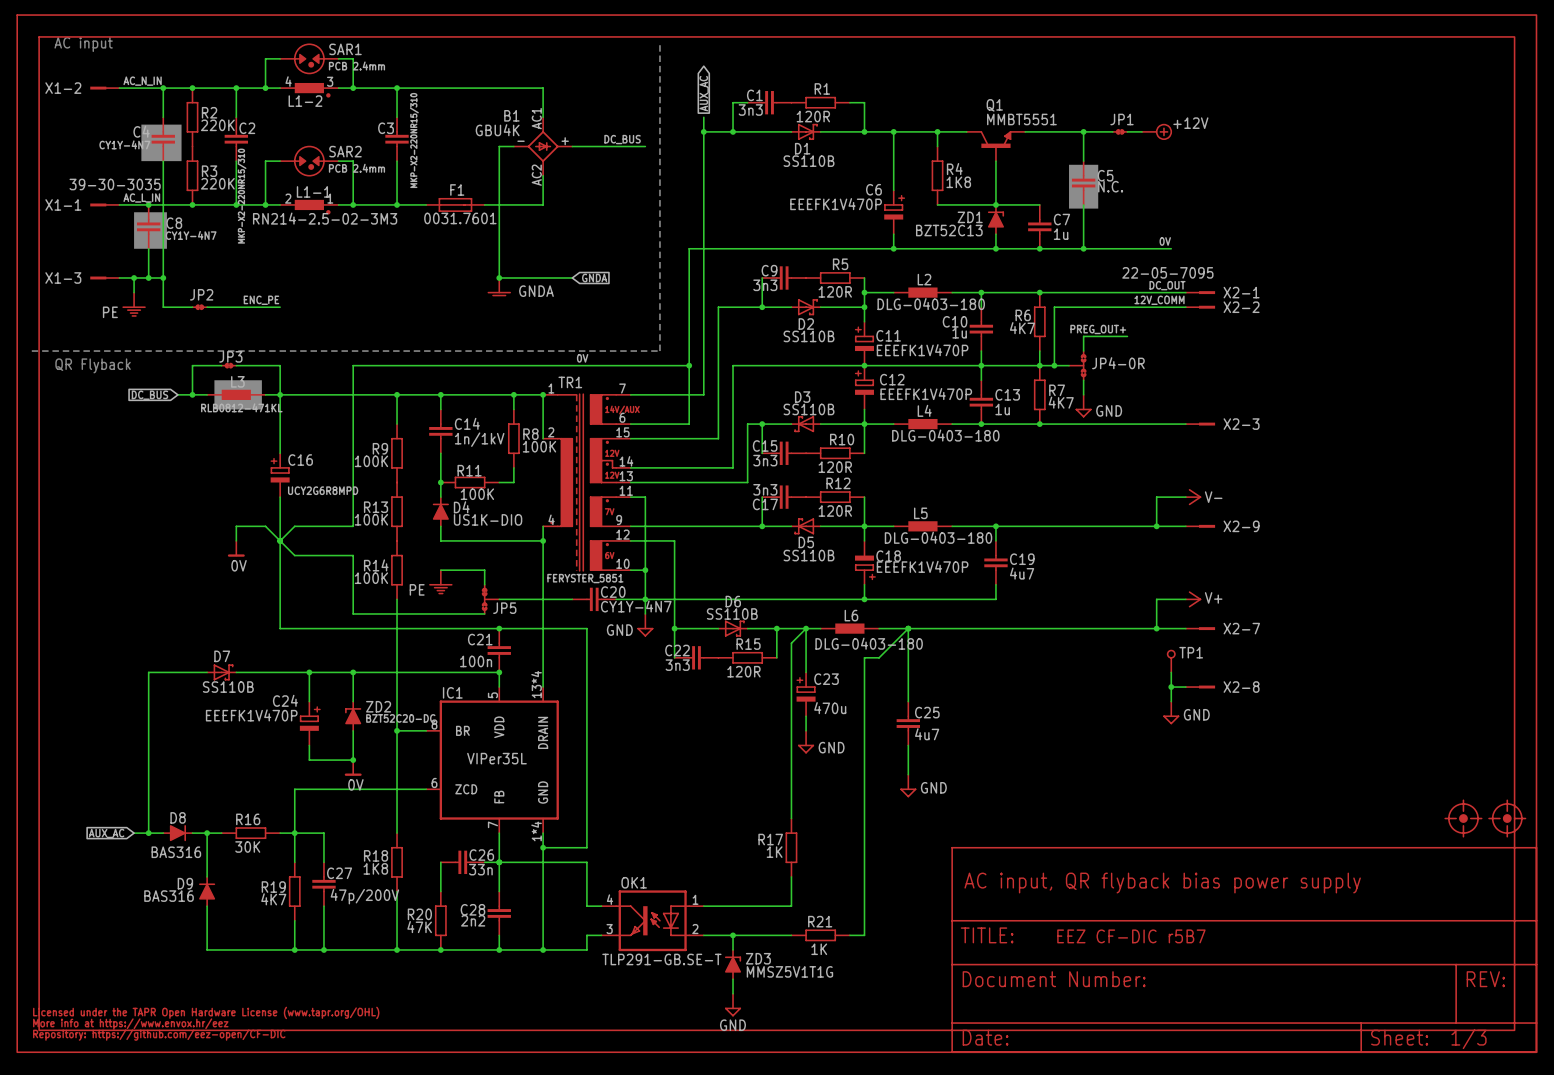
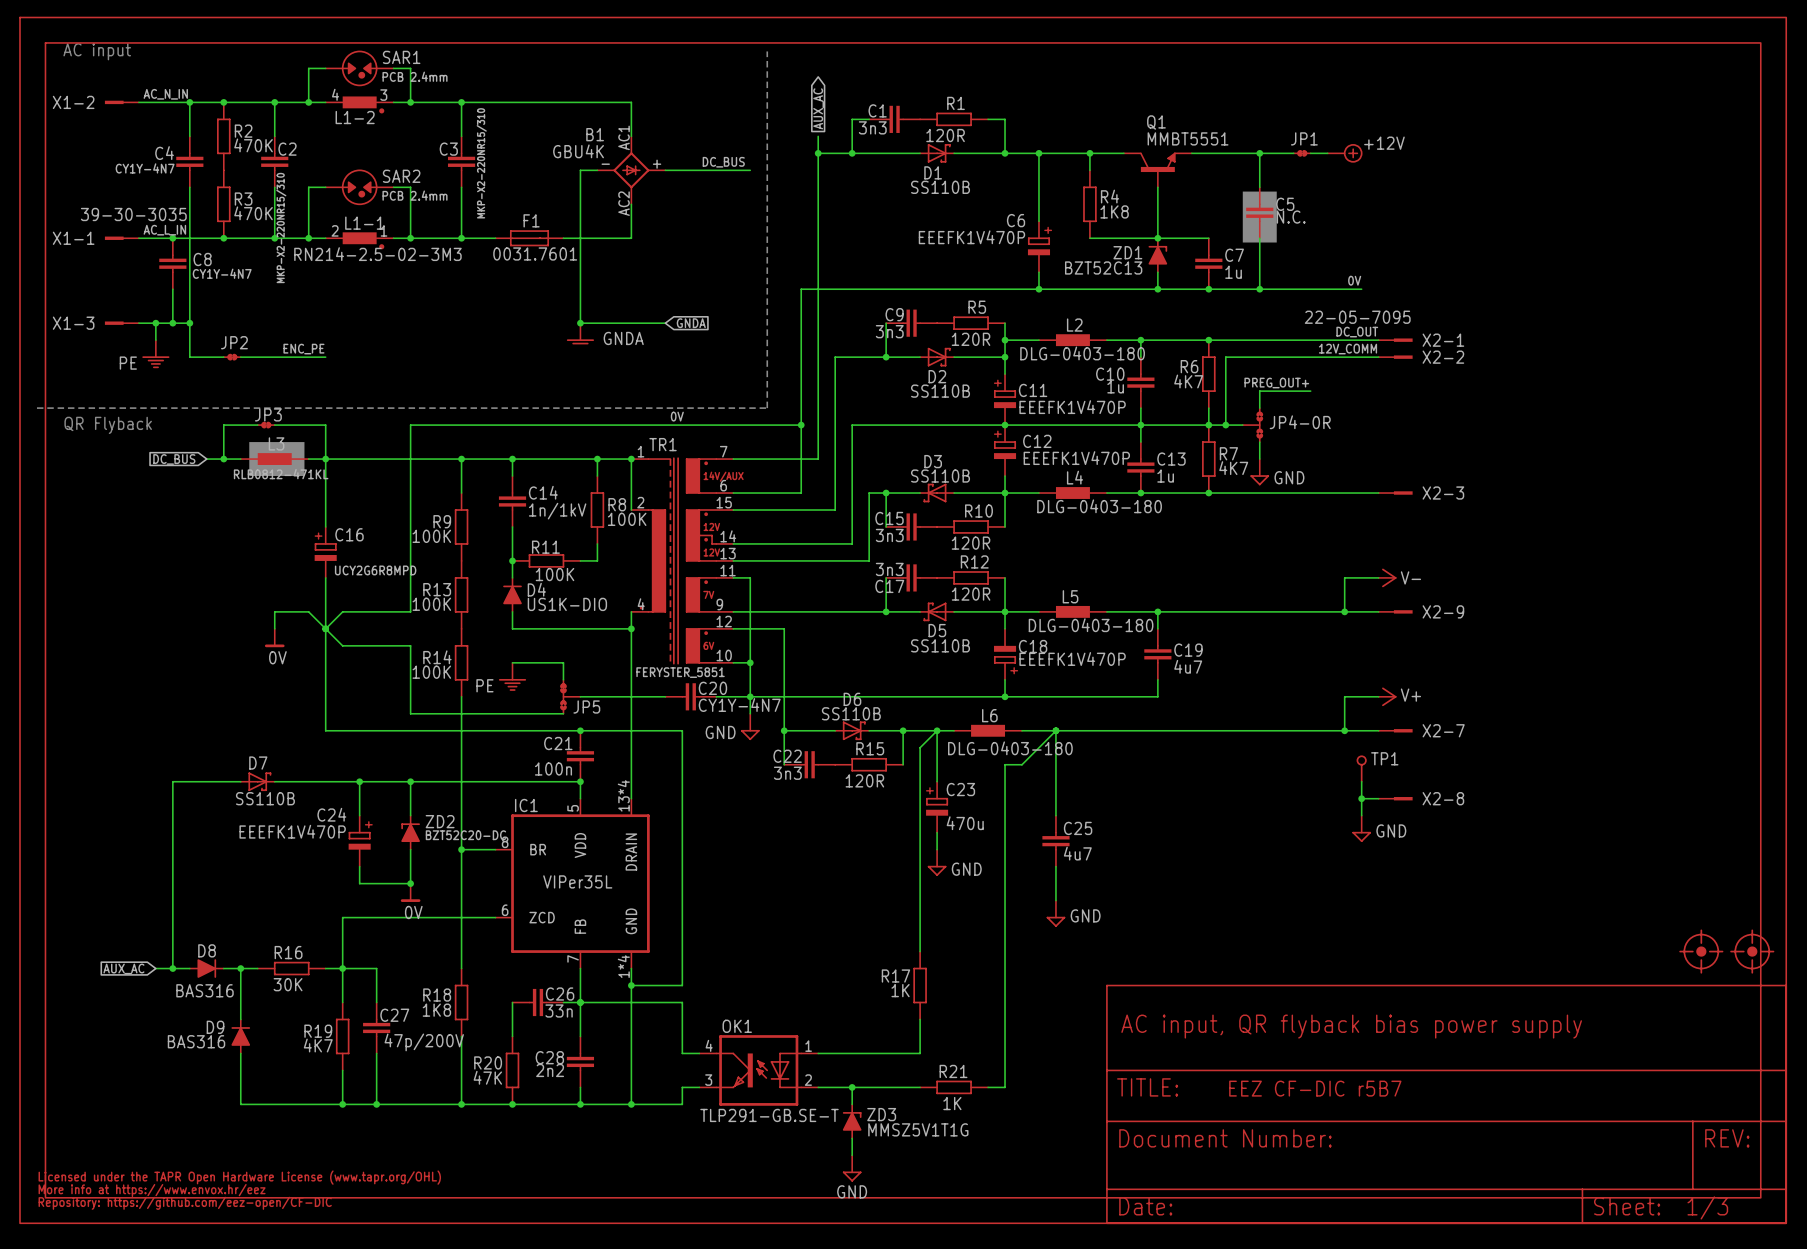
drawing: [141, 124, 182, 162] -> none
R2 value: 220K (217, 125) -> 470K (253, 145)
R3 value: 220K (217, 183) -> 470K (253, 213)
drawing: [134, 212, 167, 249] -> none

